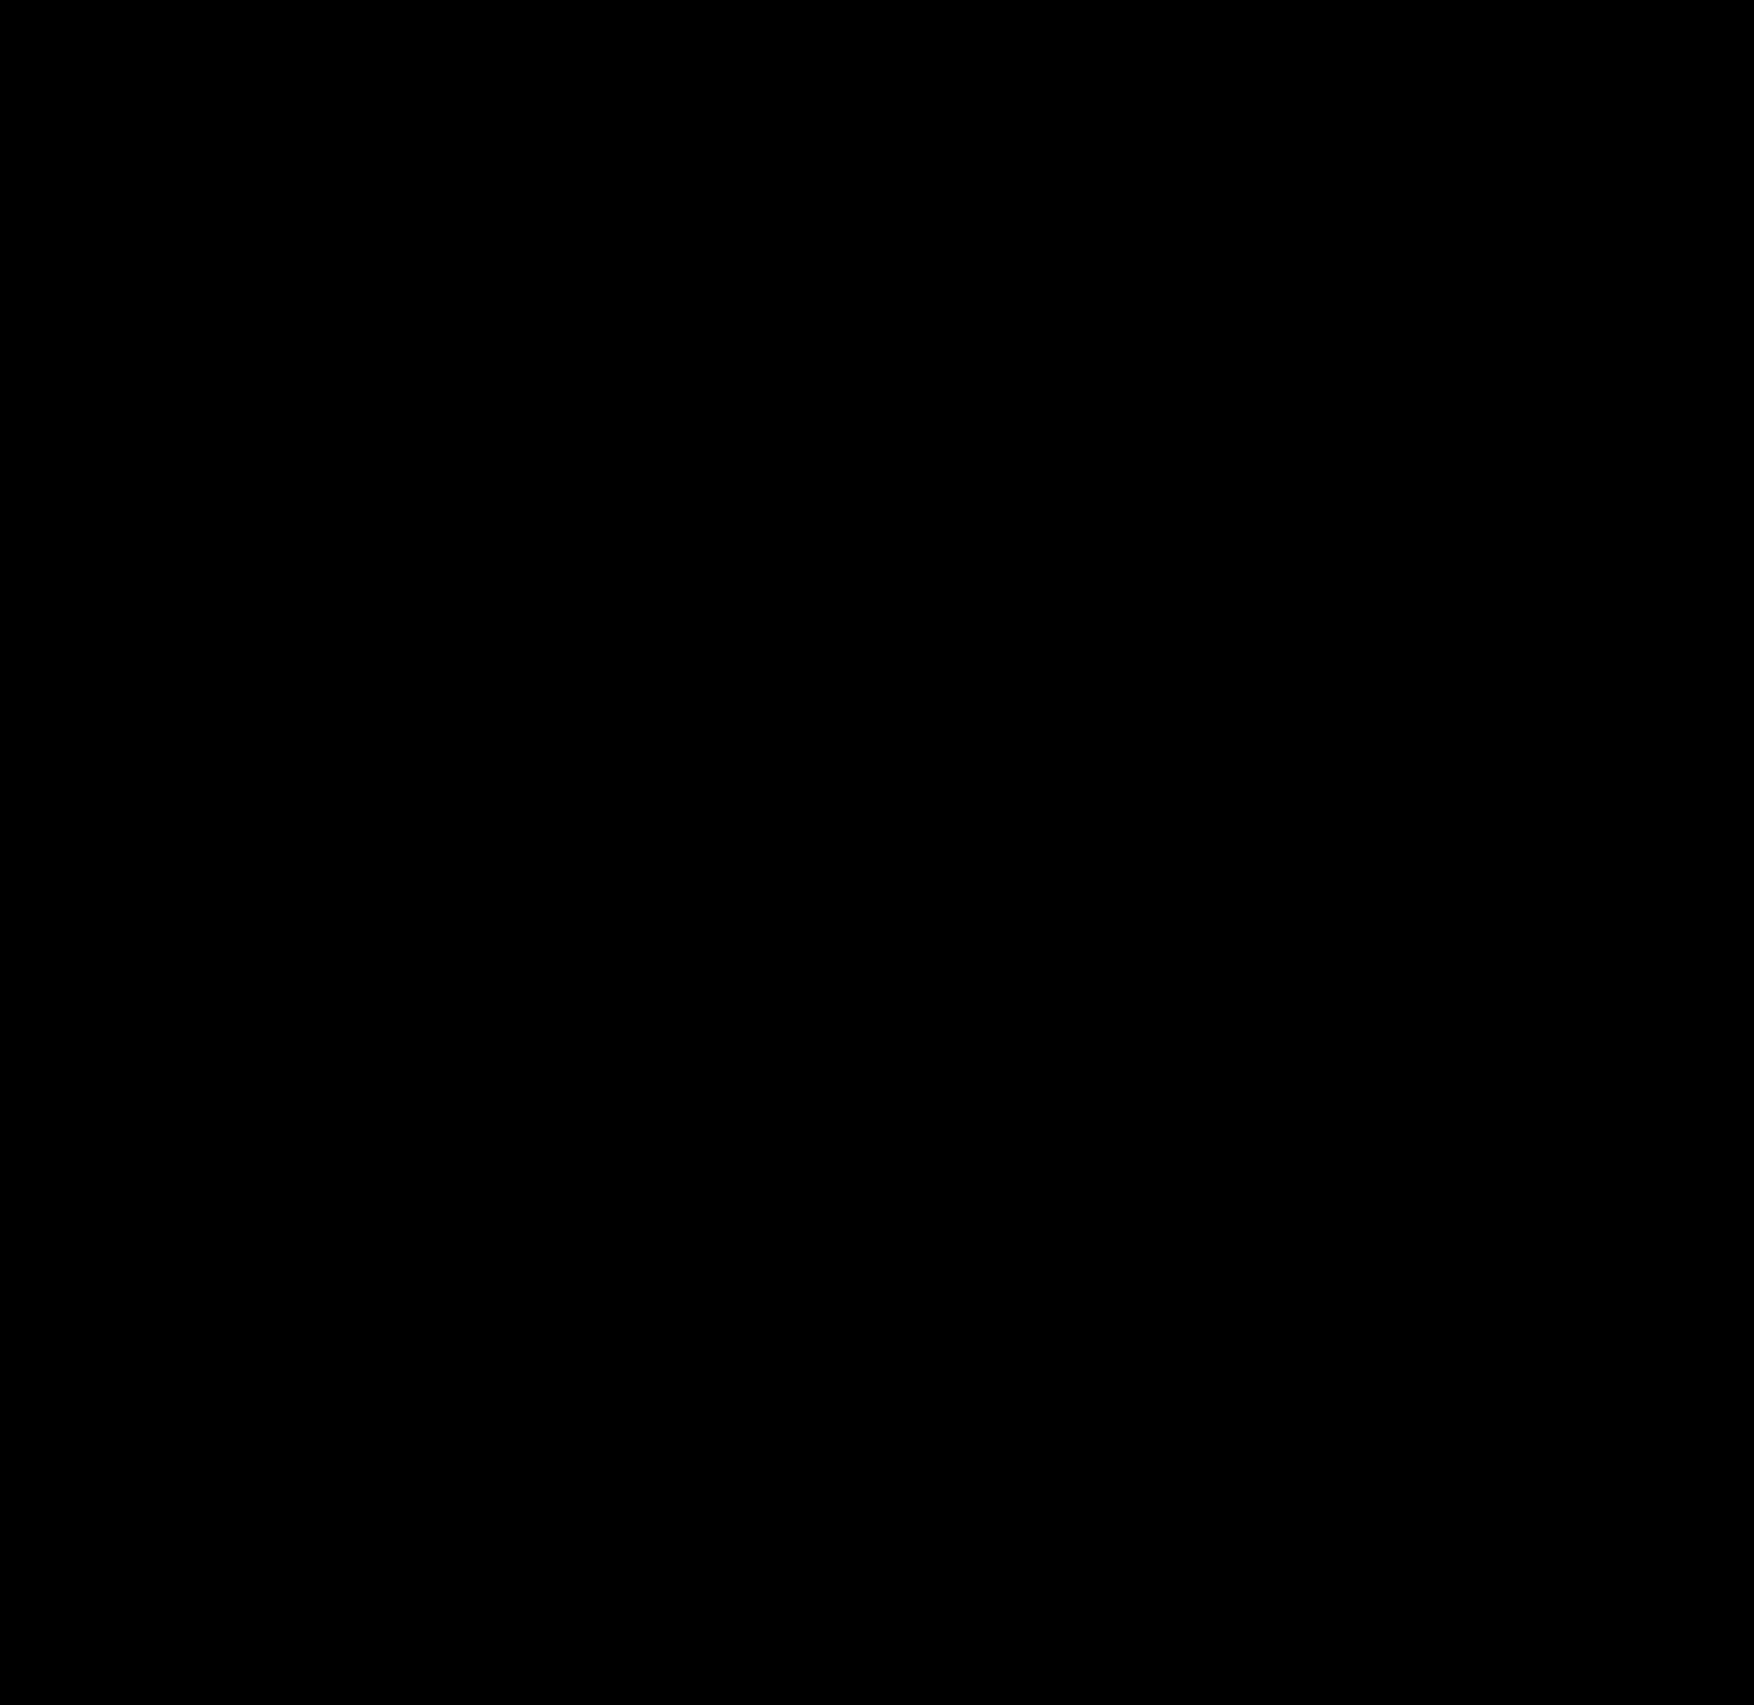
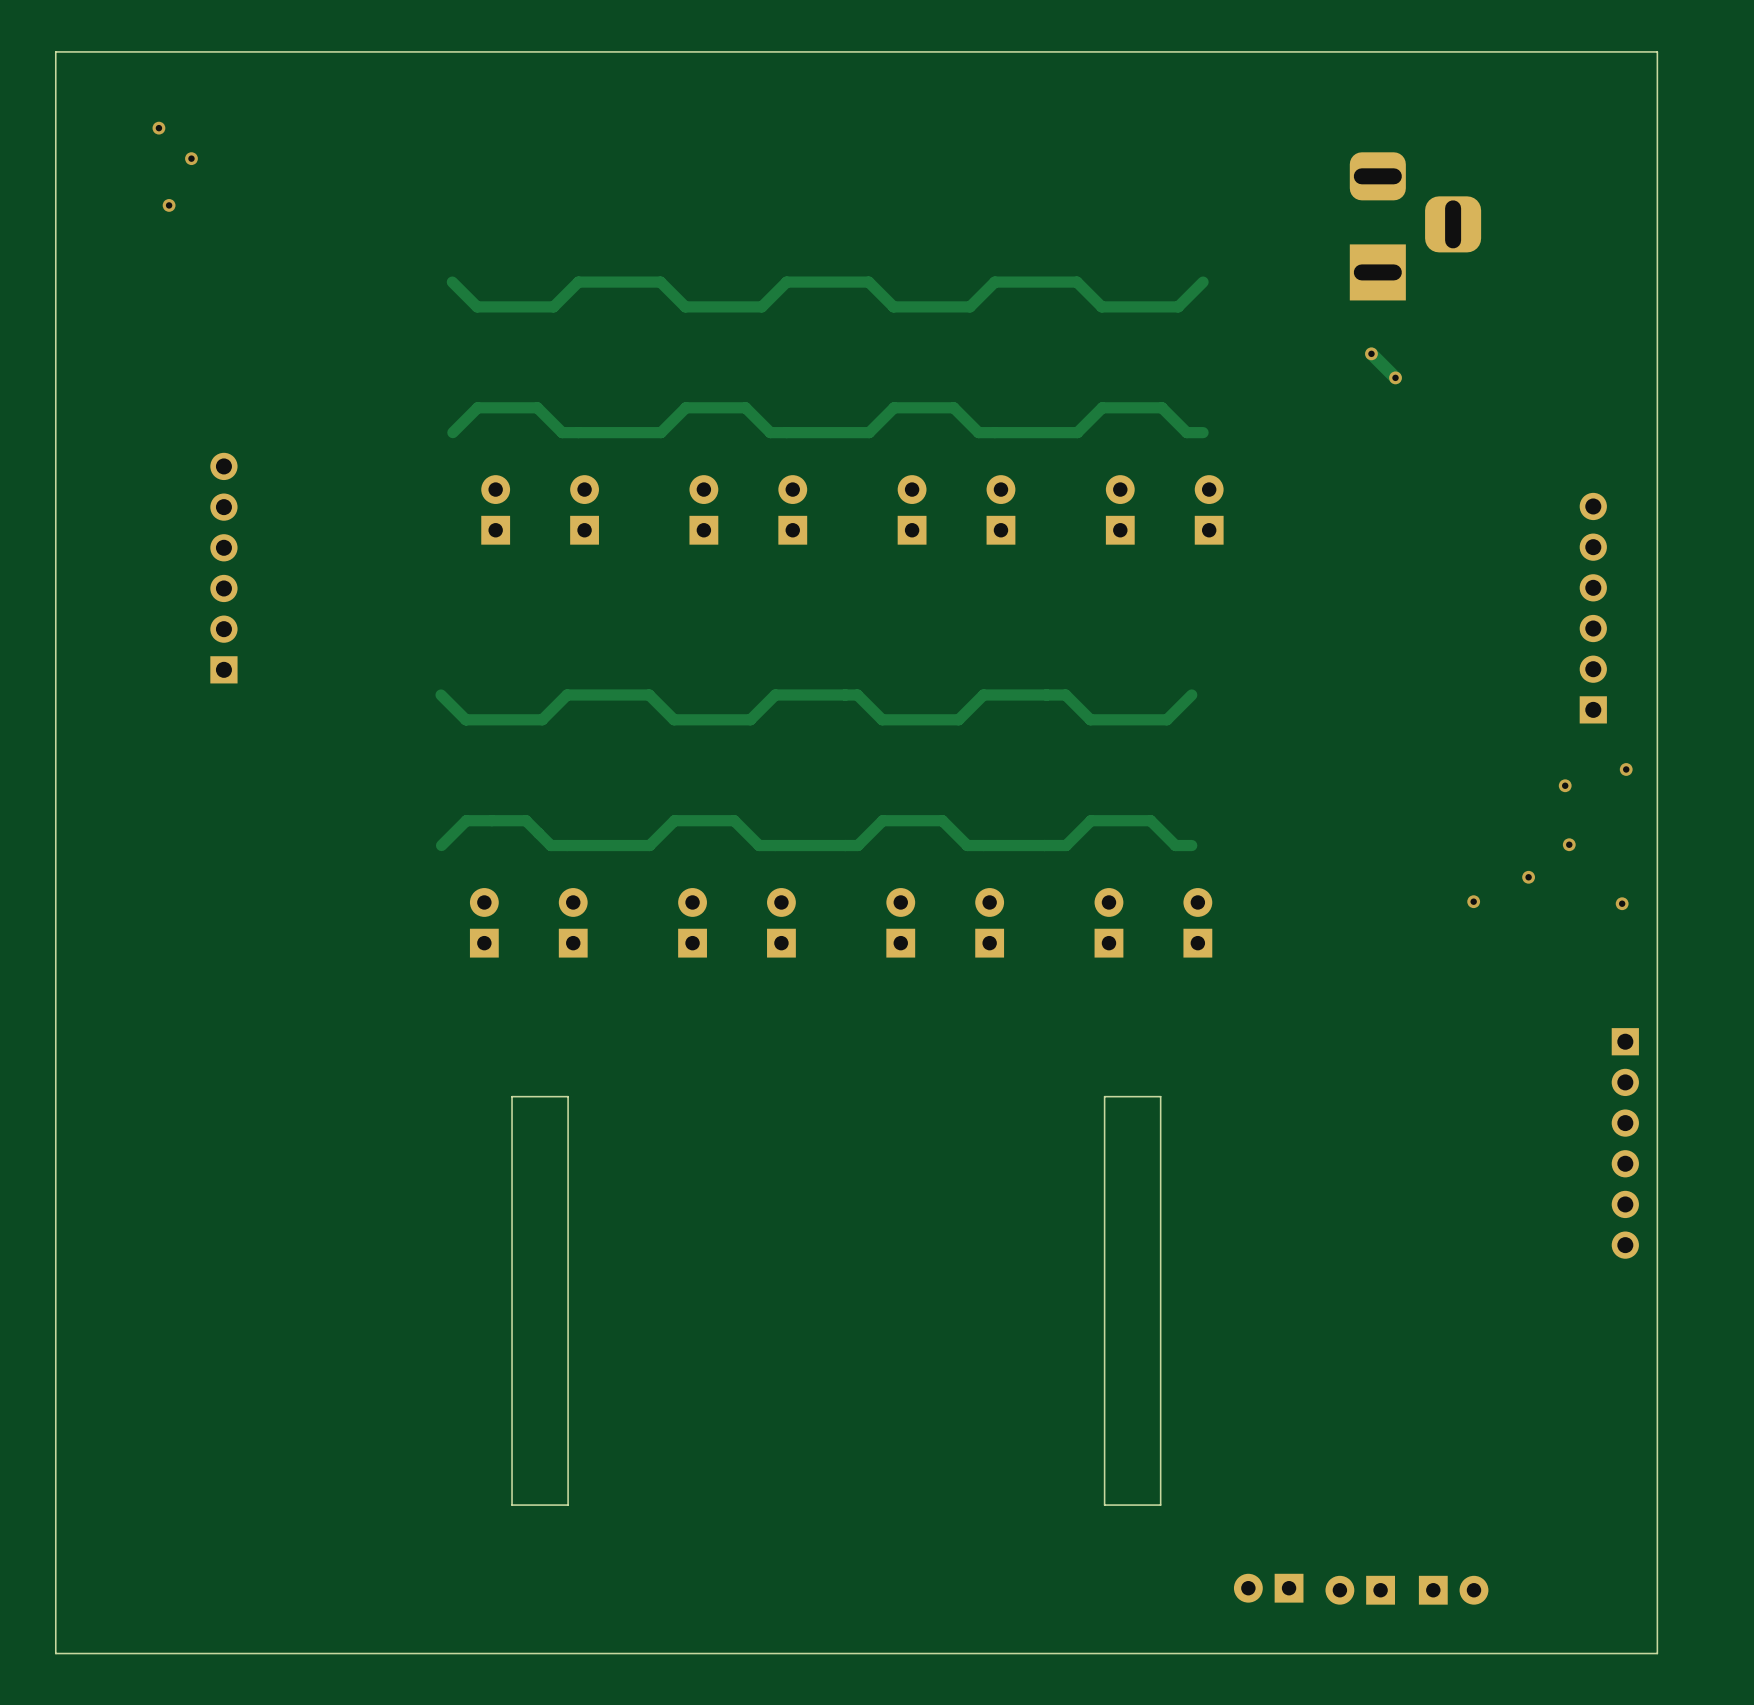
board edge: none -> (1657, 51) (55, 51) (55, 1653) (1657, 1653) (1657, 51)
via: none -> (158, 128)
via: none -> (191, 158)
via: none -> (169, 205)
part: none -> (1415, 226)
track: none -> (1203, 282) (1178, 306) (1101, 306) (1076, 282) (994, 282) (970, 306) (893, 306) (868, 282) (786, 282) (761, 306) (685, 306) (660, 282) (578, 282) (553, 306) (477, 306) (452, 282)
track: none -> (1371, 353) (1395, 377)
via: none -> (1371, 353)
via: none -> (1395, 377)
track: none -> (1203, 432) (1186, 432) (1162, 407) (1102, 407) (1077, 432) (978, 432) (953, 407) (894, 407) (869, 432) (770, 432) (745, 407) (685, 407) (661, 432) (562, 432) (537, 407) (477, 407) (452, 432)
part: none -> (495, 509)
part: none -> (584, 509)
part: none -> (703, 509)
part: none -> (792, 509)
part: none -> (912, 509)
part: none -> (1000, 509)
part: none -> (1120, 509)
part: none -> (1209, 509)
part: none -> (223, 568)
part: none -> (1593, 608)
track: none -> (1191, 694) (1166, 719) (1090, 719) (1065, 695) (983, 694) (958, 719) (882, 719) (857, 695) (775, 694) (750, 719) (674, 719) (649, 694) (567, 694) (542, 719) (465, 719) (441, 695)
via: none -> (1626, 769)
via: none -> (1565, 785)
via: none -> (1569, 844)
track: none -> (1191, 845) (1175, 845) (1150, 820) (1090, 820) (1066, 845) (967, 845) (942, 820) (882, 820) (857, 845) (759, 845) (734, 820) (674, 820) (649, 845) (550, 845) (526, 820) (466, 820) (441, 845)
via: none -> (1528, 877)
via: none -> (1473, 901)
via: none -> (1622, 903)
part: none -> (484, 922)
part: none -> (573, 922)
part: none -> (692, 922)
part: none -> (781, 922)
part: none -> (900, 922)
part: none -> (989, 922)
part: none -> (1108, 922)
part: none -> (1197, 922)
board edge: none -> (568, 1096) (512, 1096) (512, 1505) (568, 1505) (568, 1096)
board edge: none -> (1160, 1096) (1104, 1096) (1104, 1505) (1160, 1505) (1160, 1096)
part: none -> (1625, 1143)
part: none -> (1268, 1588)
part: none -> (1360, 1590)
part: none -> (1453, 1590)

